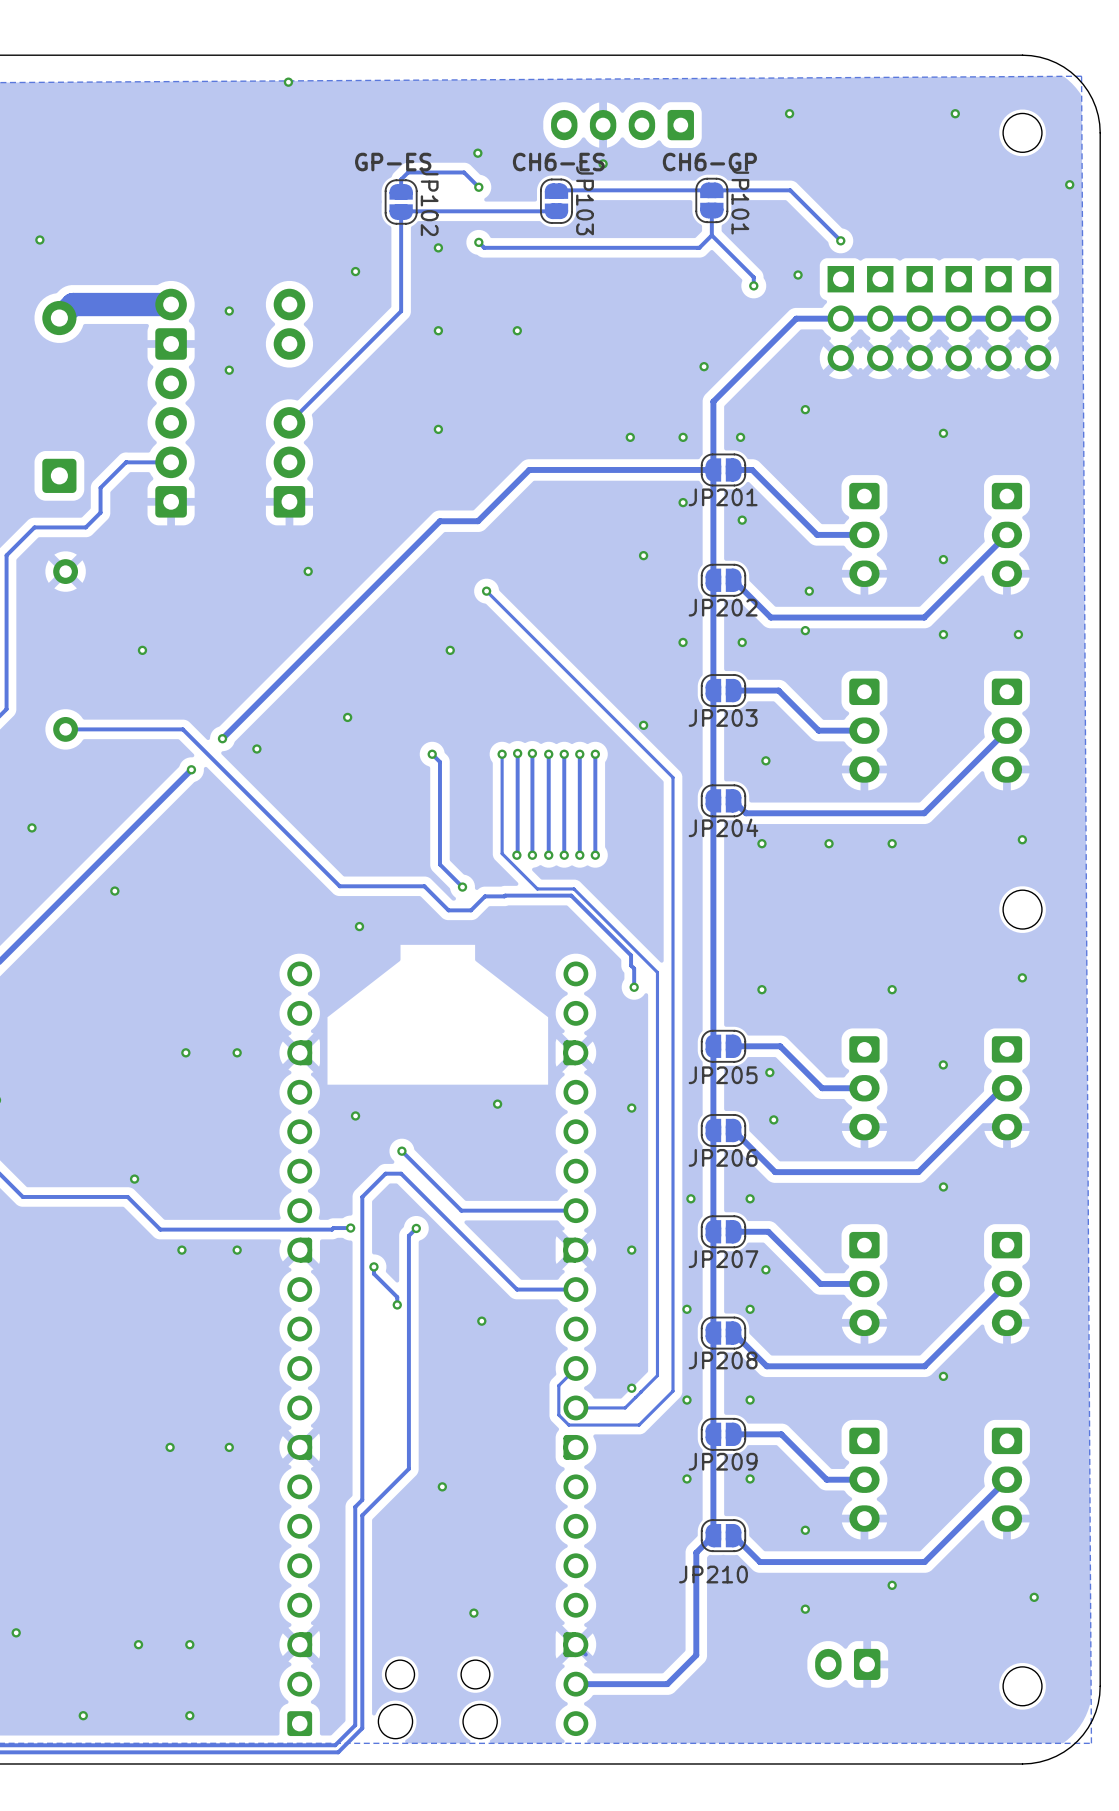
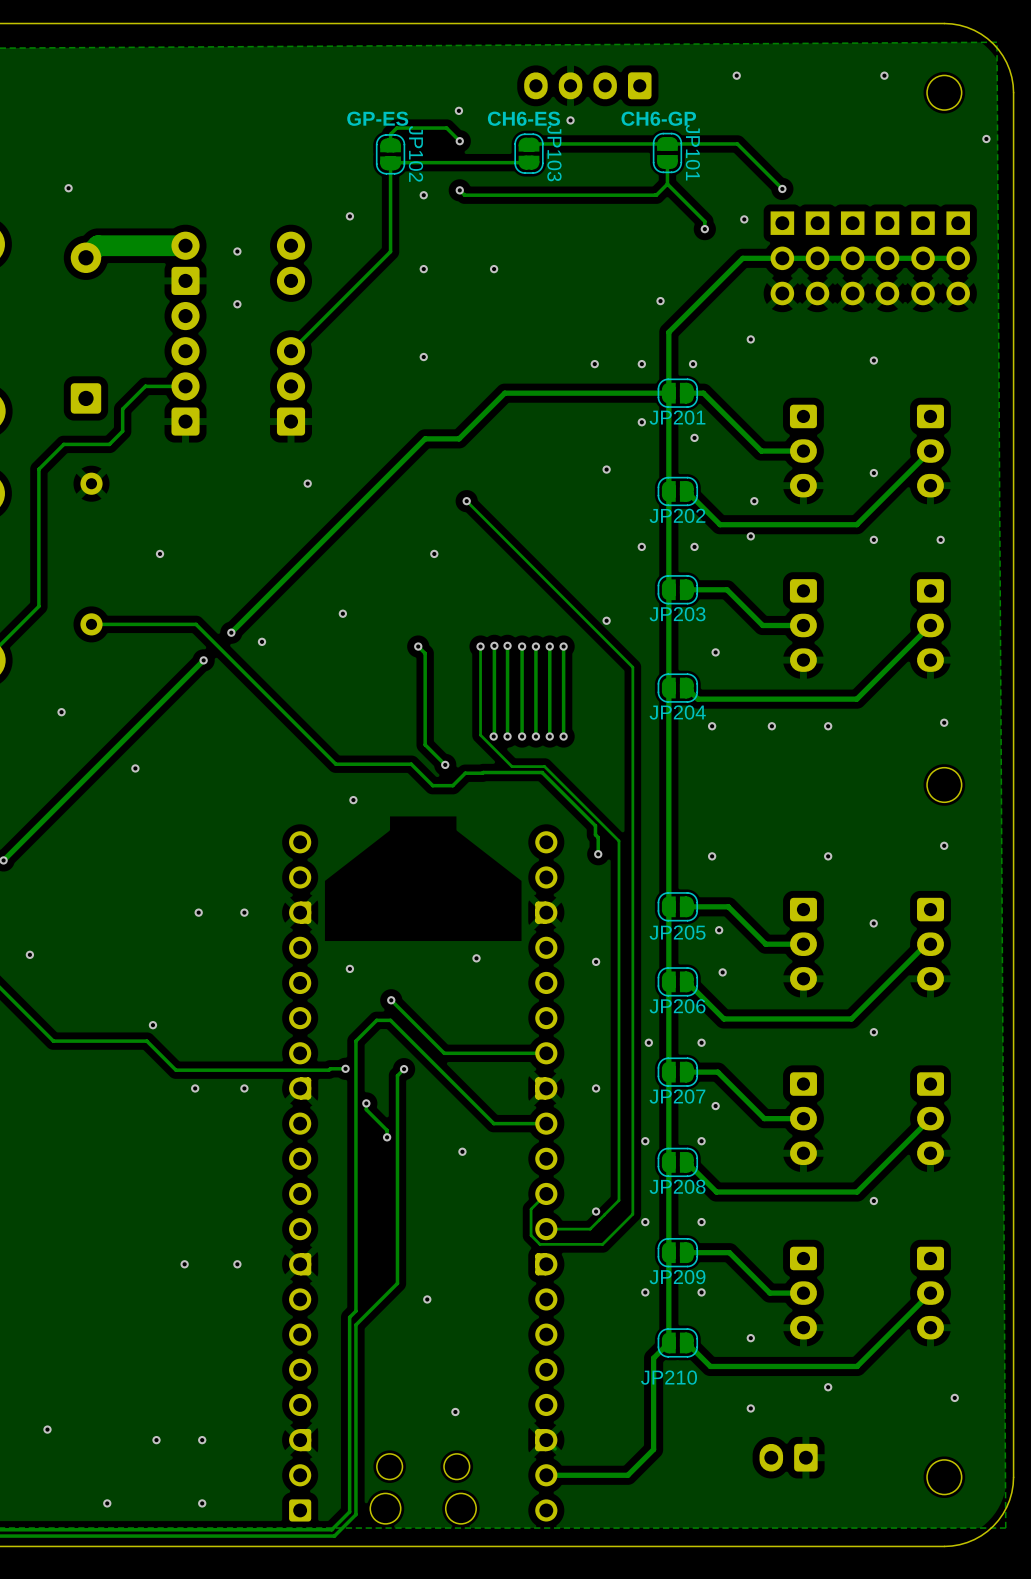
via: (288, 82) -> none

